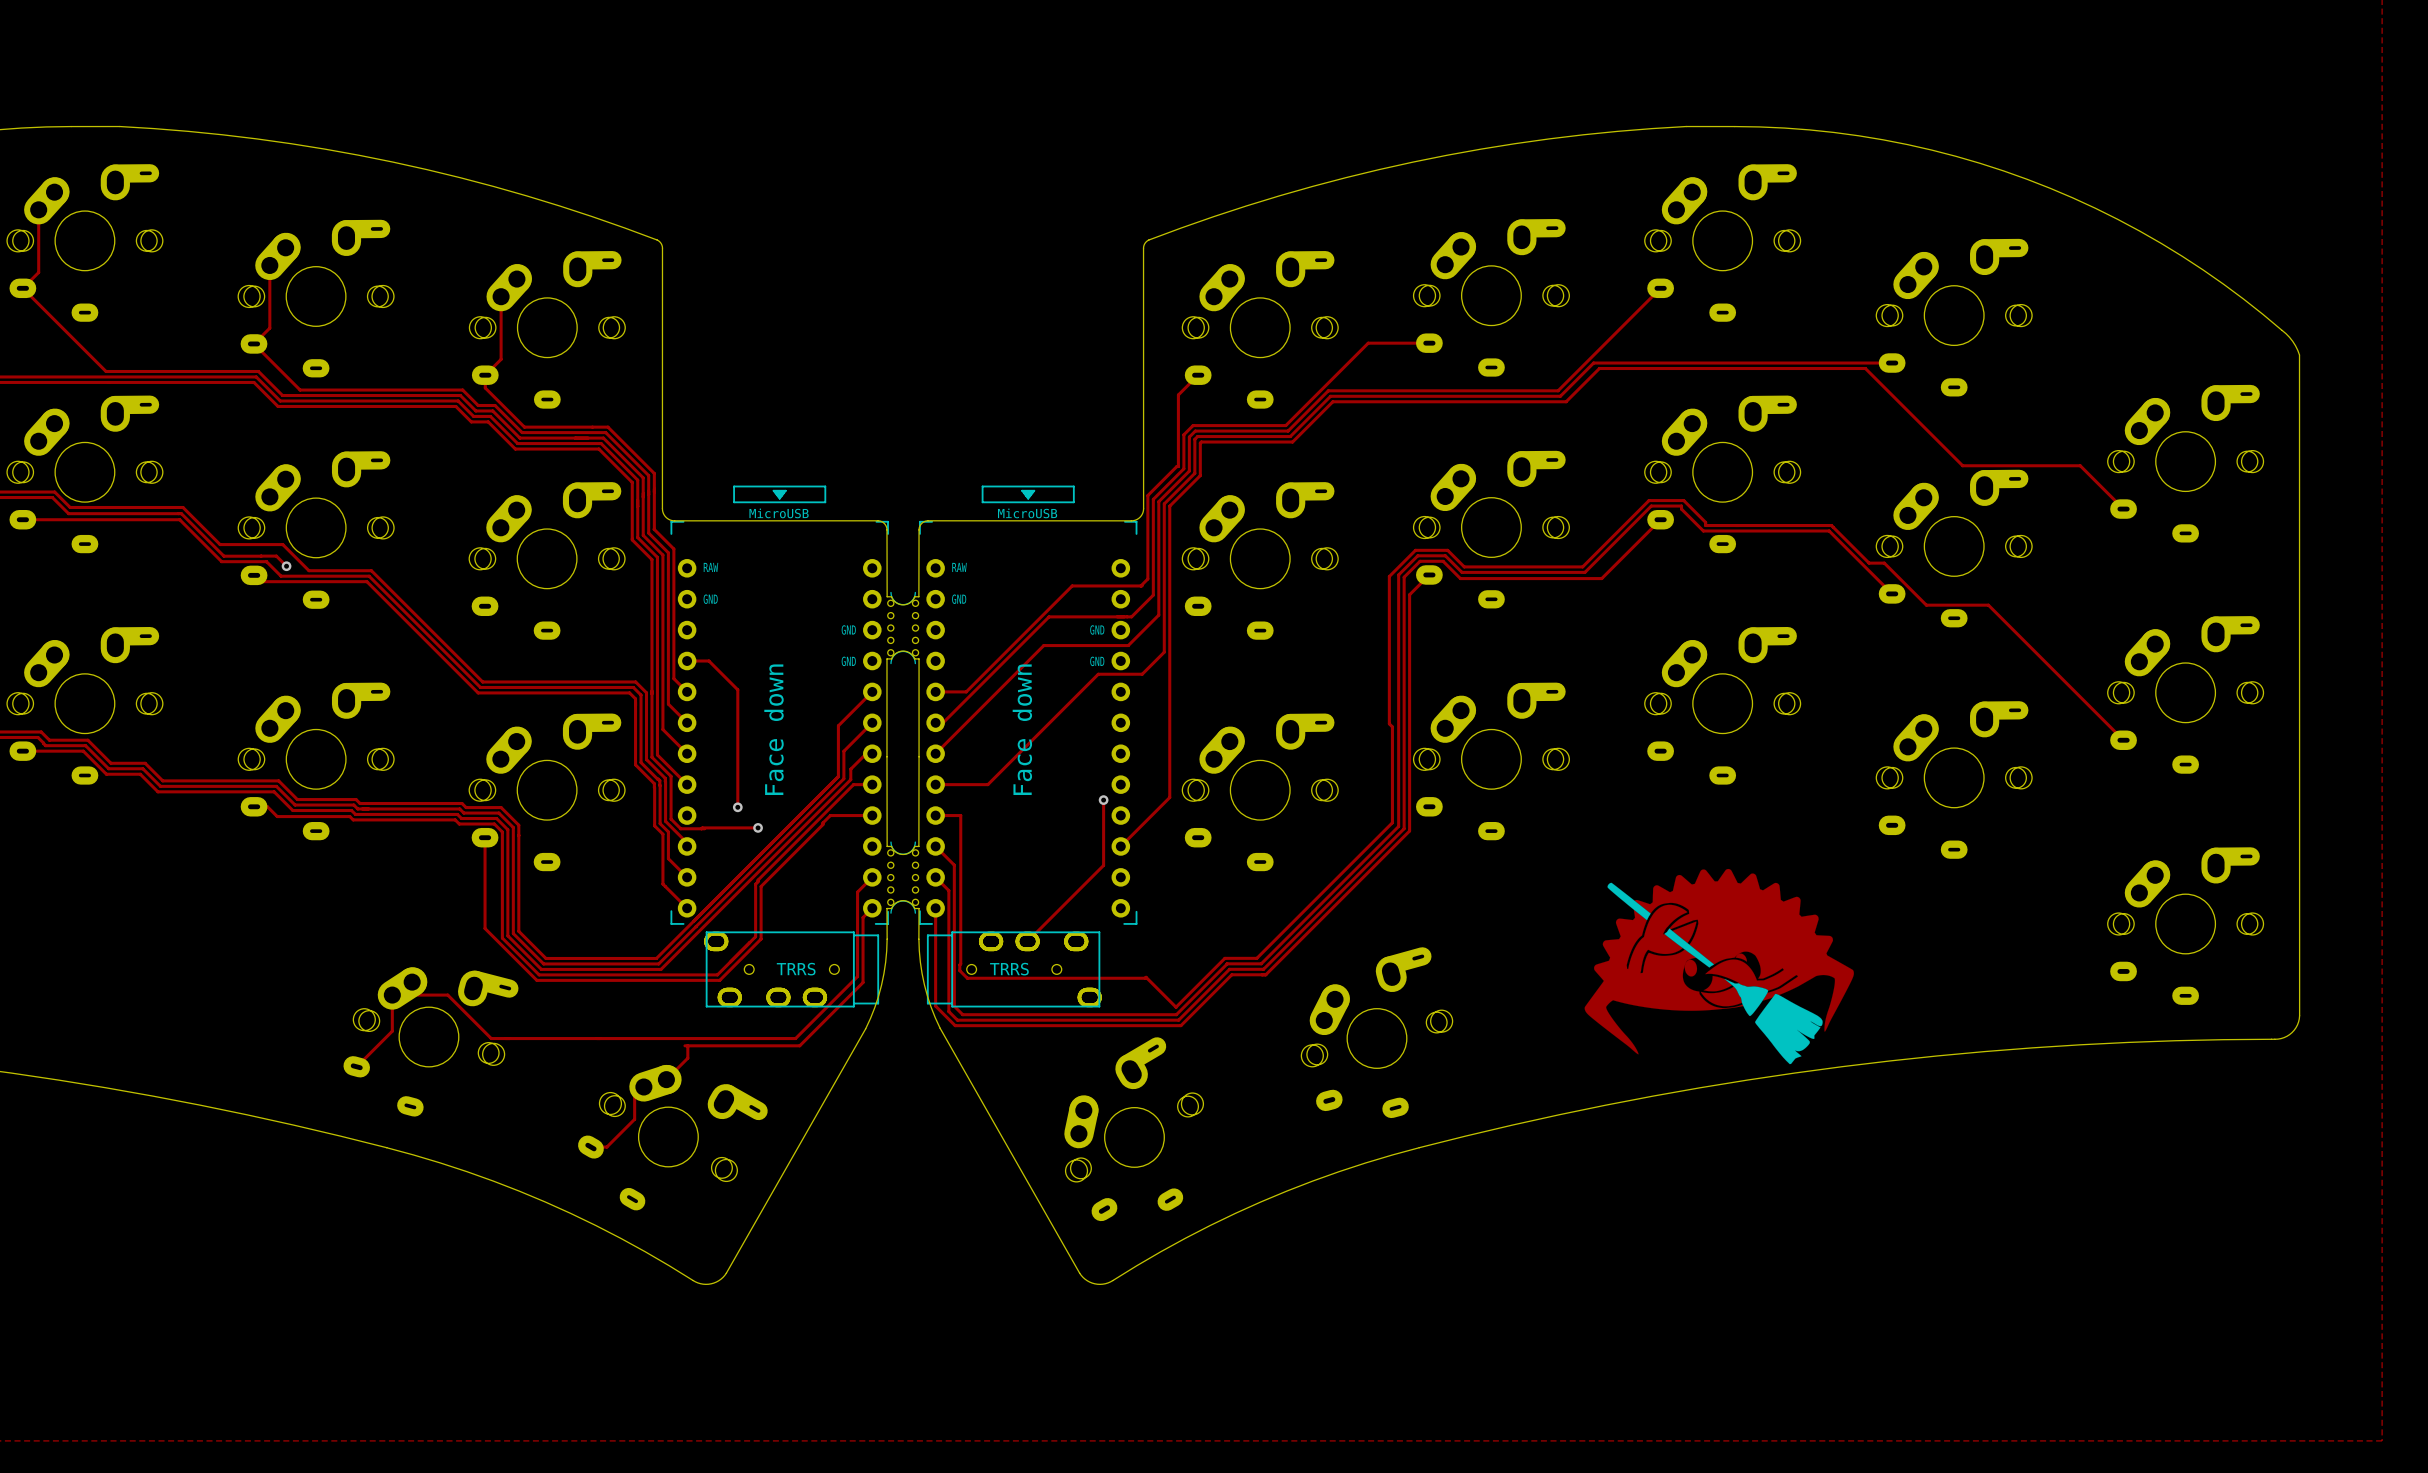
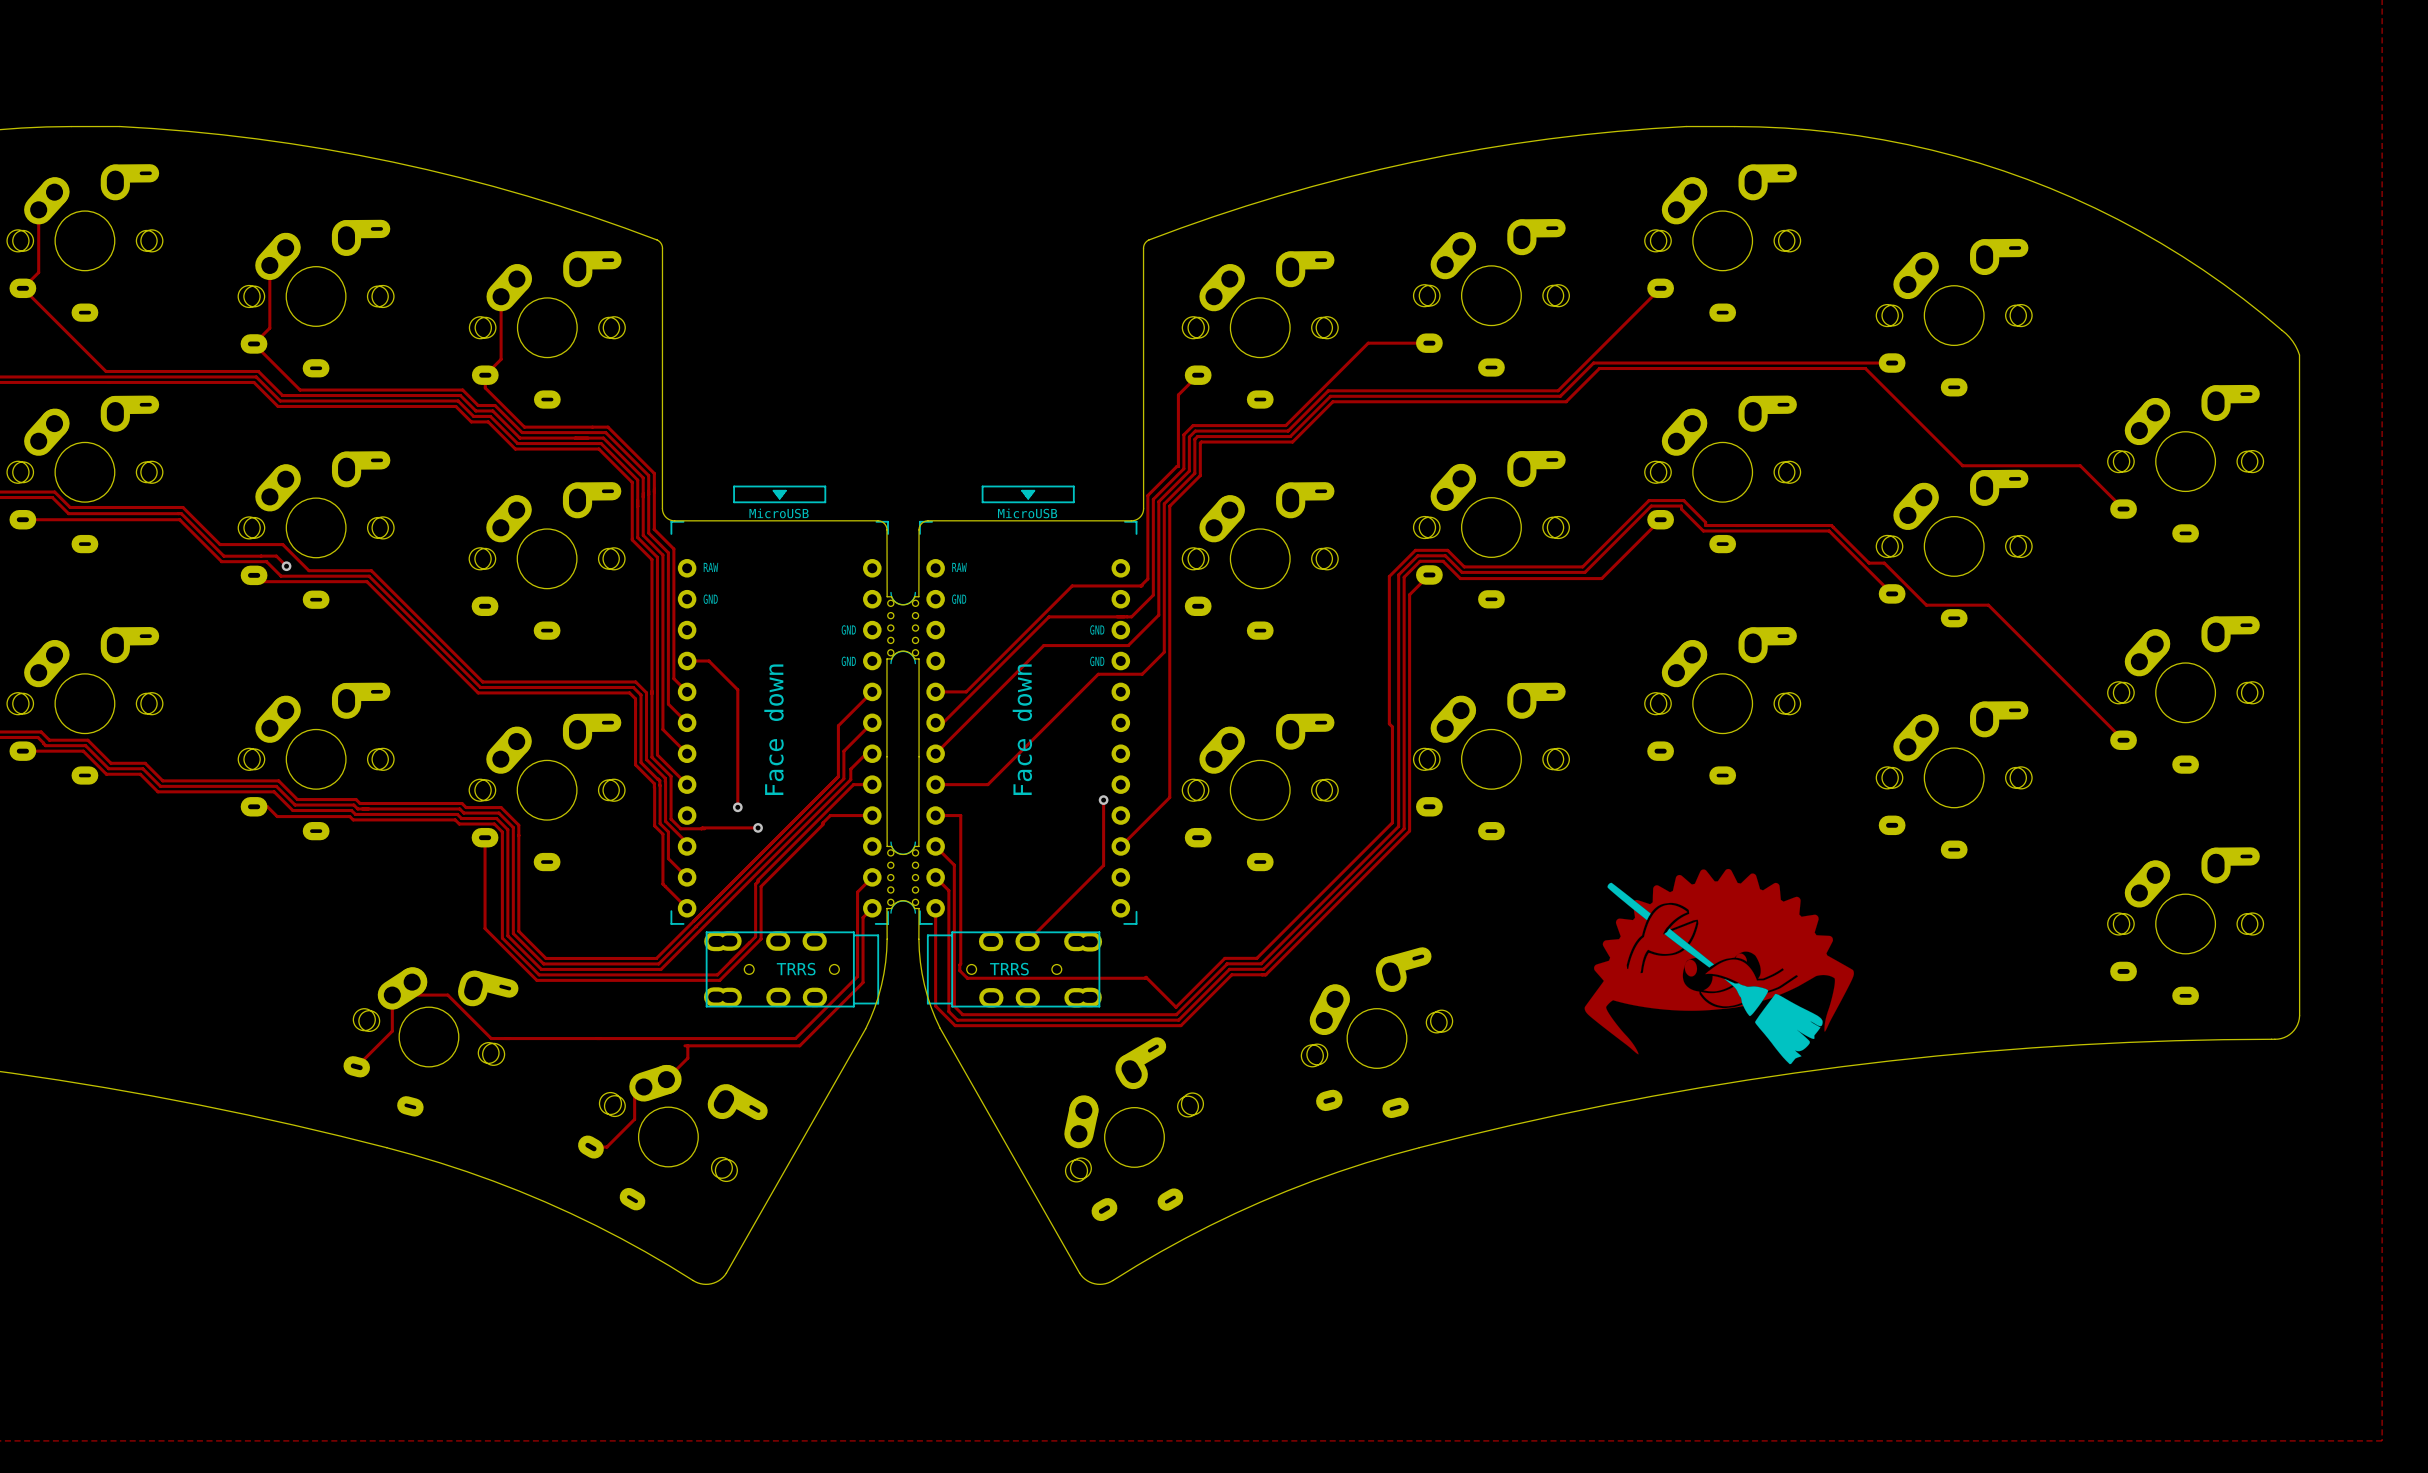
part footprint: [703, 931, 880, 1008] -> [703, 931, 880, 1008]
part footprint: [926, 931, 1102, 1008] -> [926, 931, 1103, 1008]

